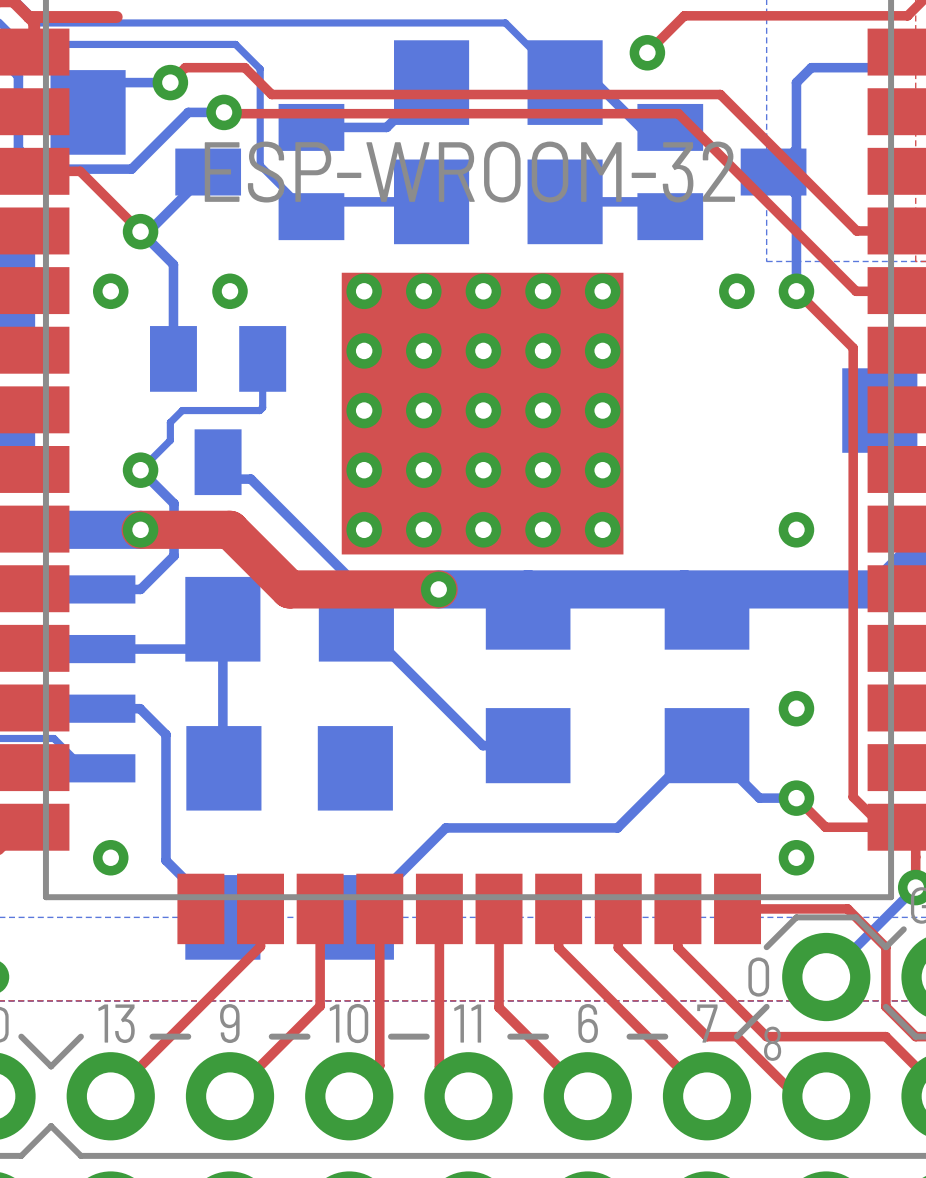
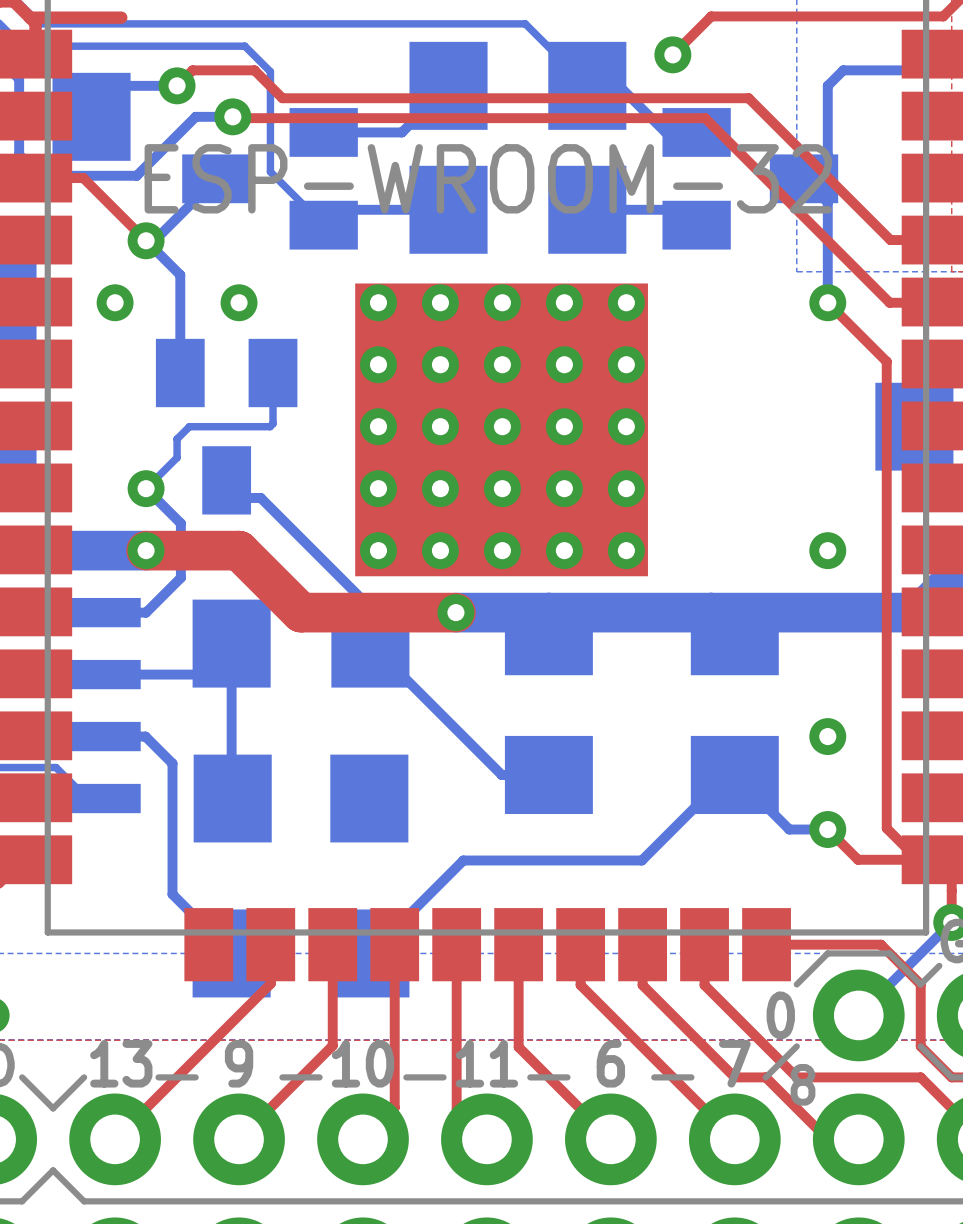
via: (736, 291) -> none
via: (110, 857) -> none
via: (796, 857) -> none

